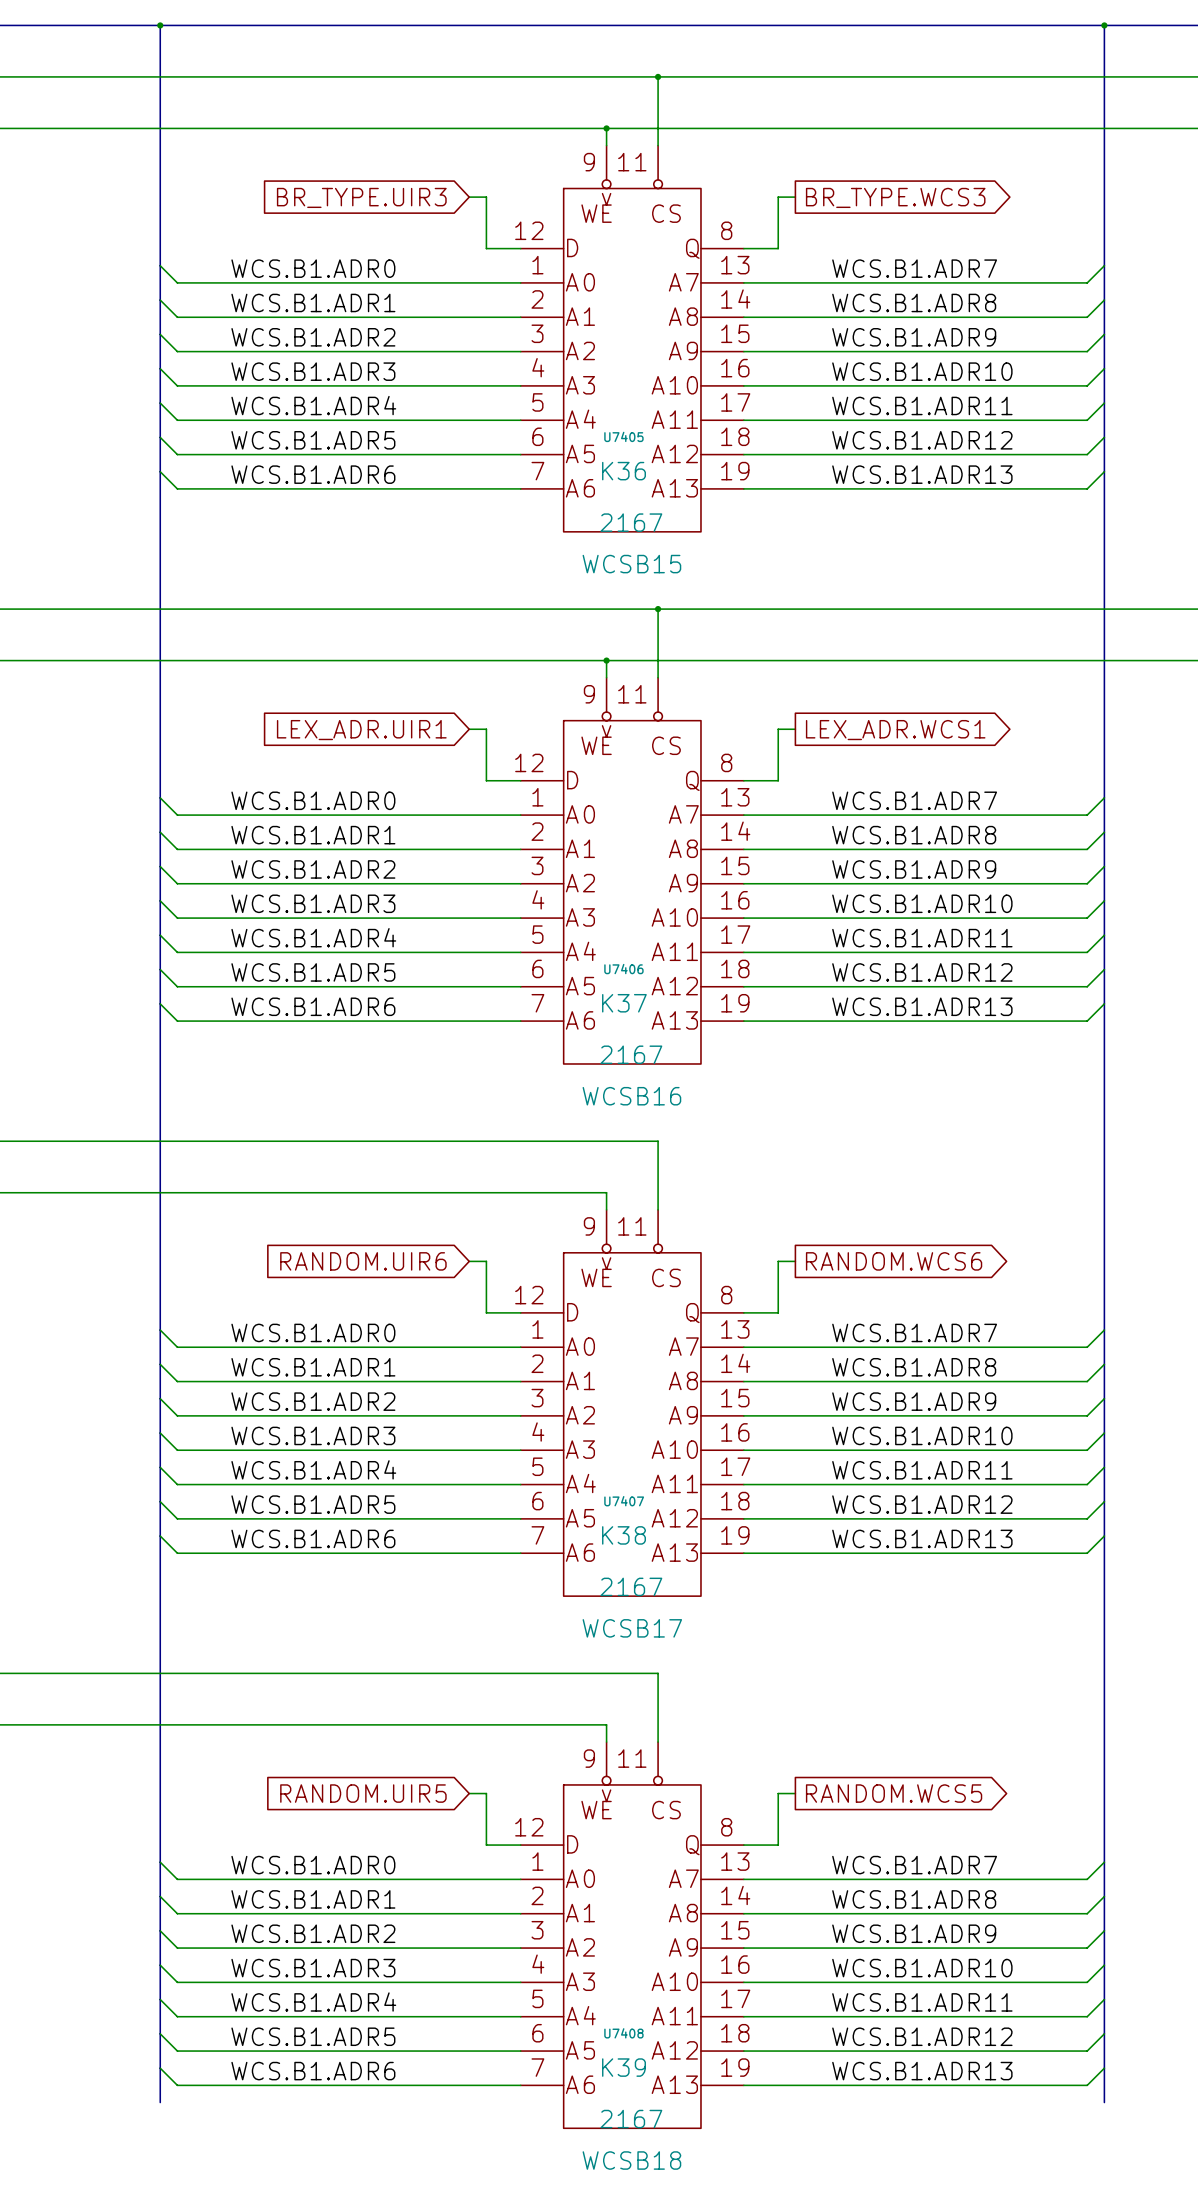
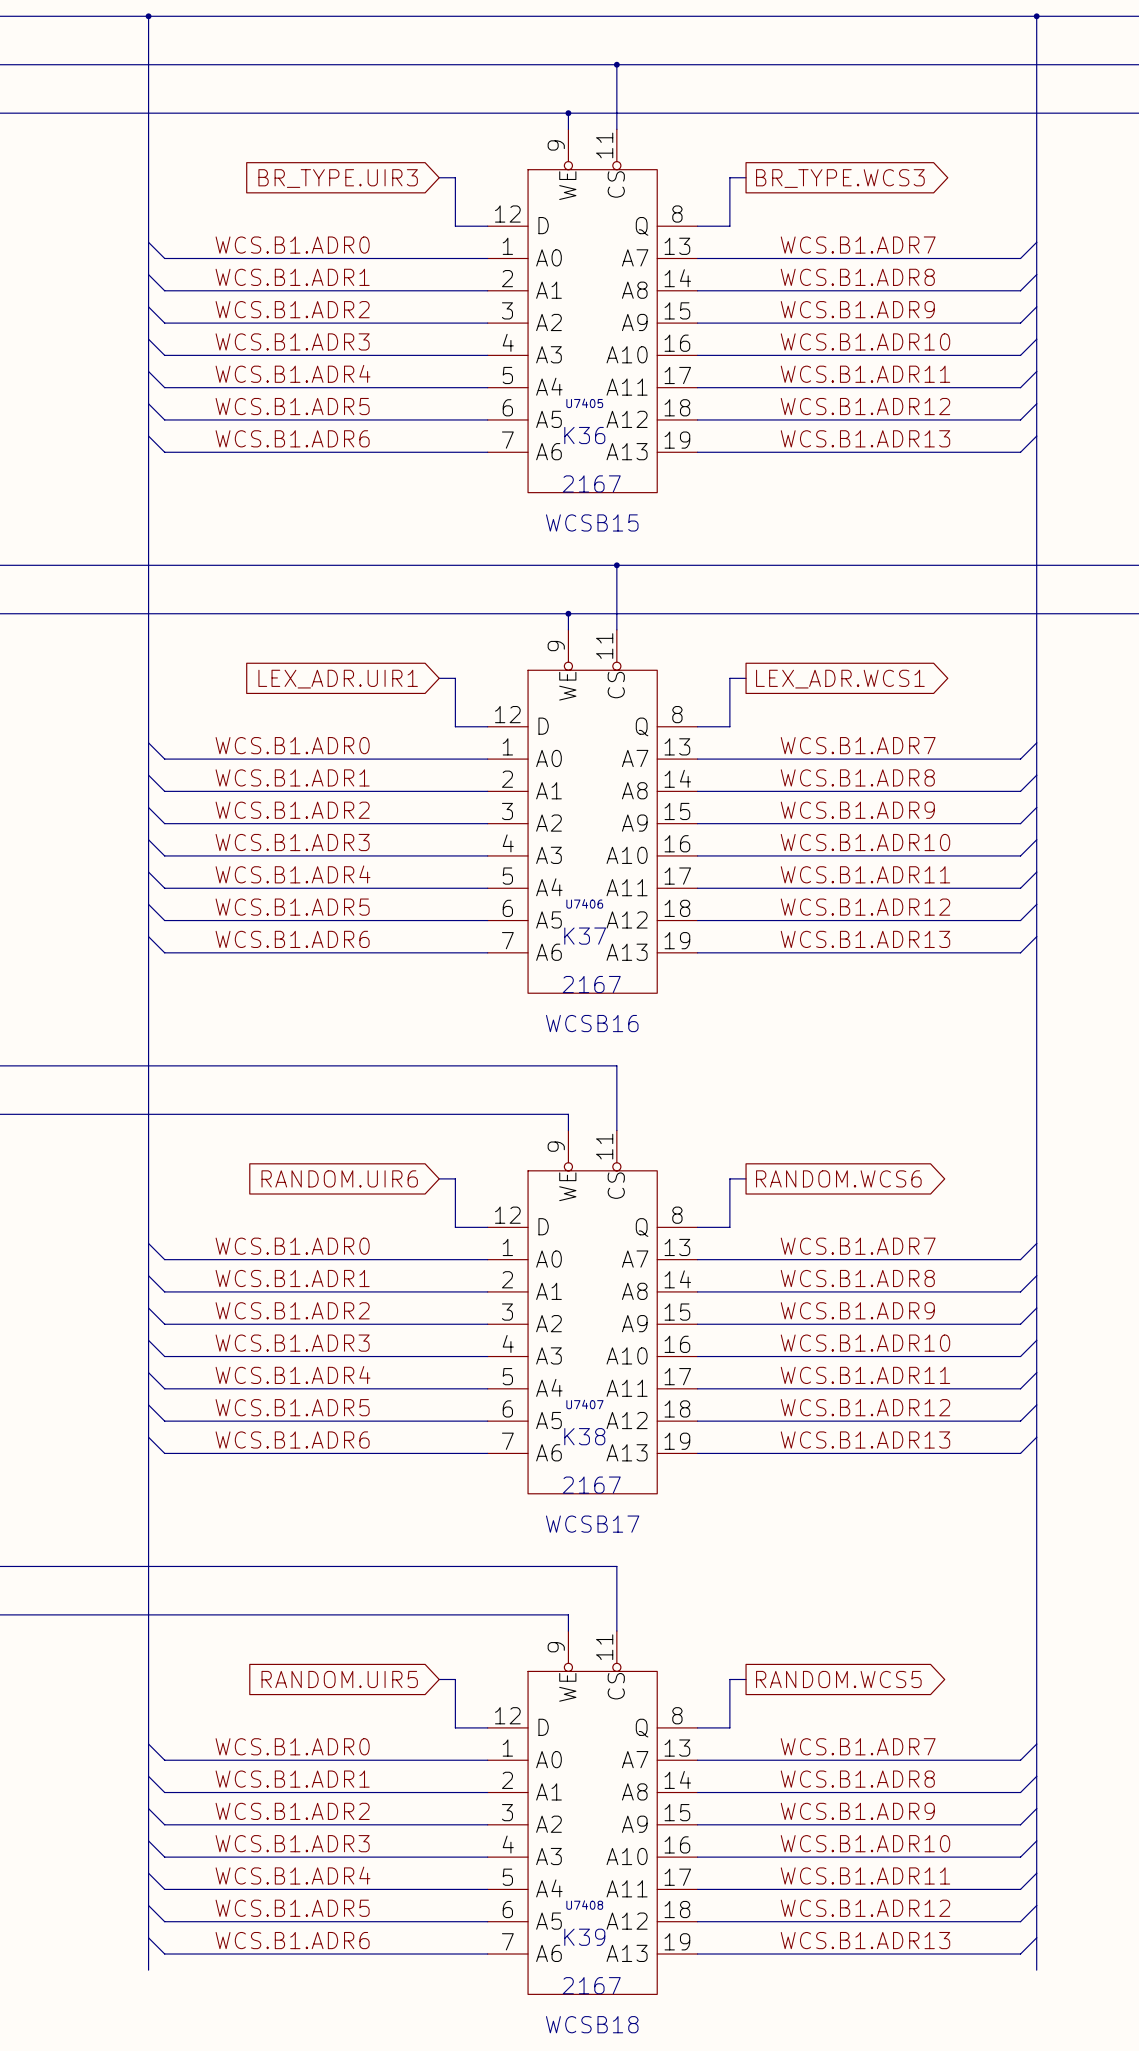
U7405 symbol: [520, 145, 744, 532] -> [487, 129, 698, 493]
U7406 symbol: [520, 677, 744, 1064] -> [487, 629, 698, 994]
U7407 symbol: [520, 1209, 744, 1597] -> [487, 1130, 698, 1494]
U7408 symbol: [520, 1742, 744, 2129] -> [487, 1631, 698, 1995]

